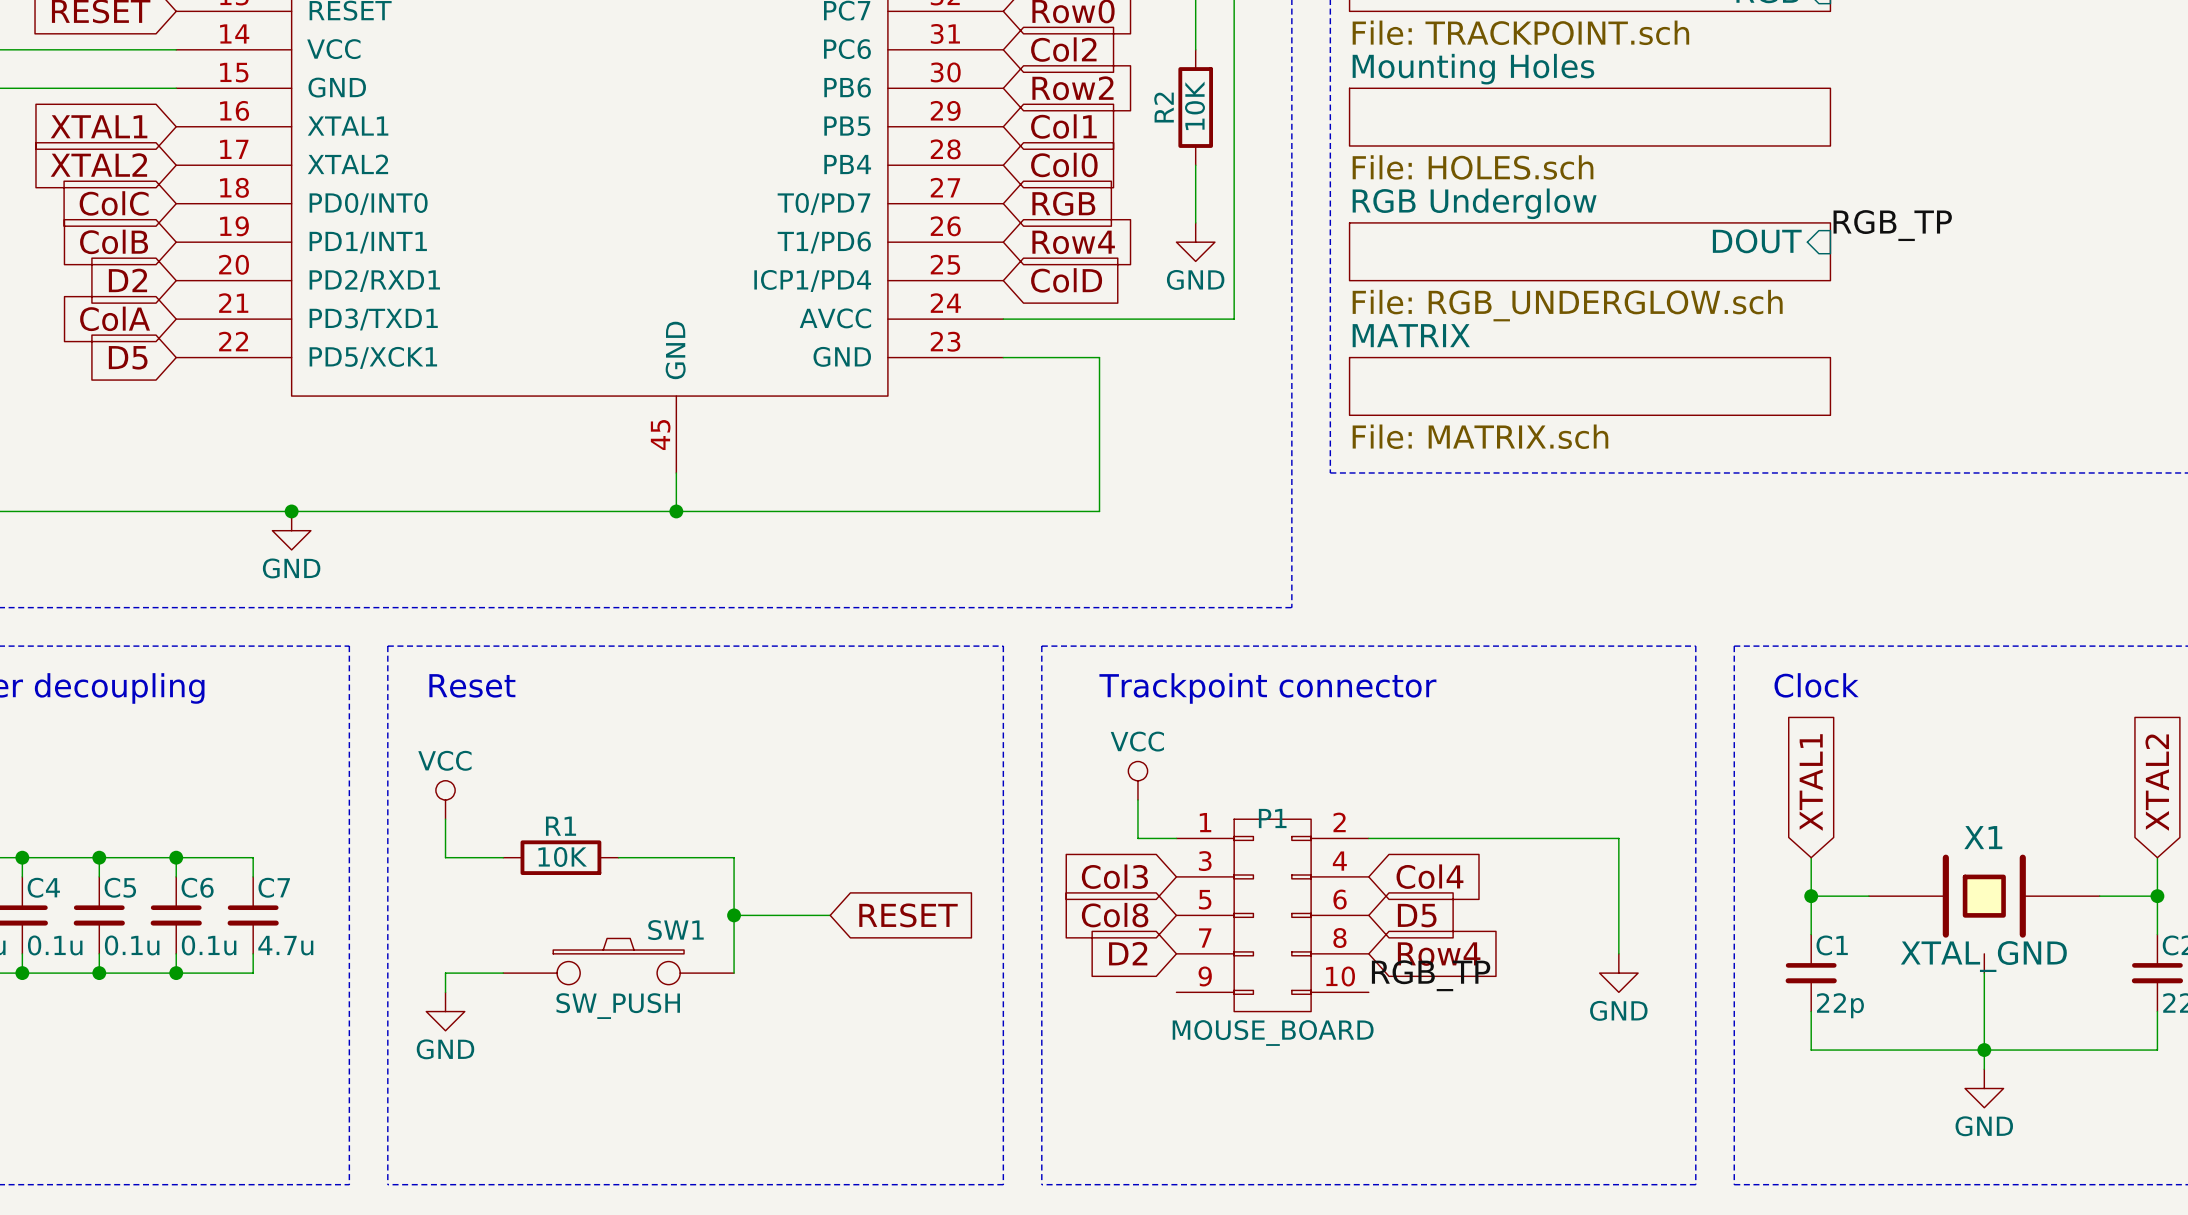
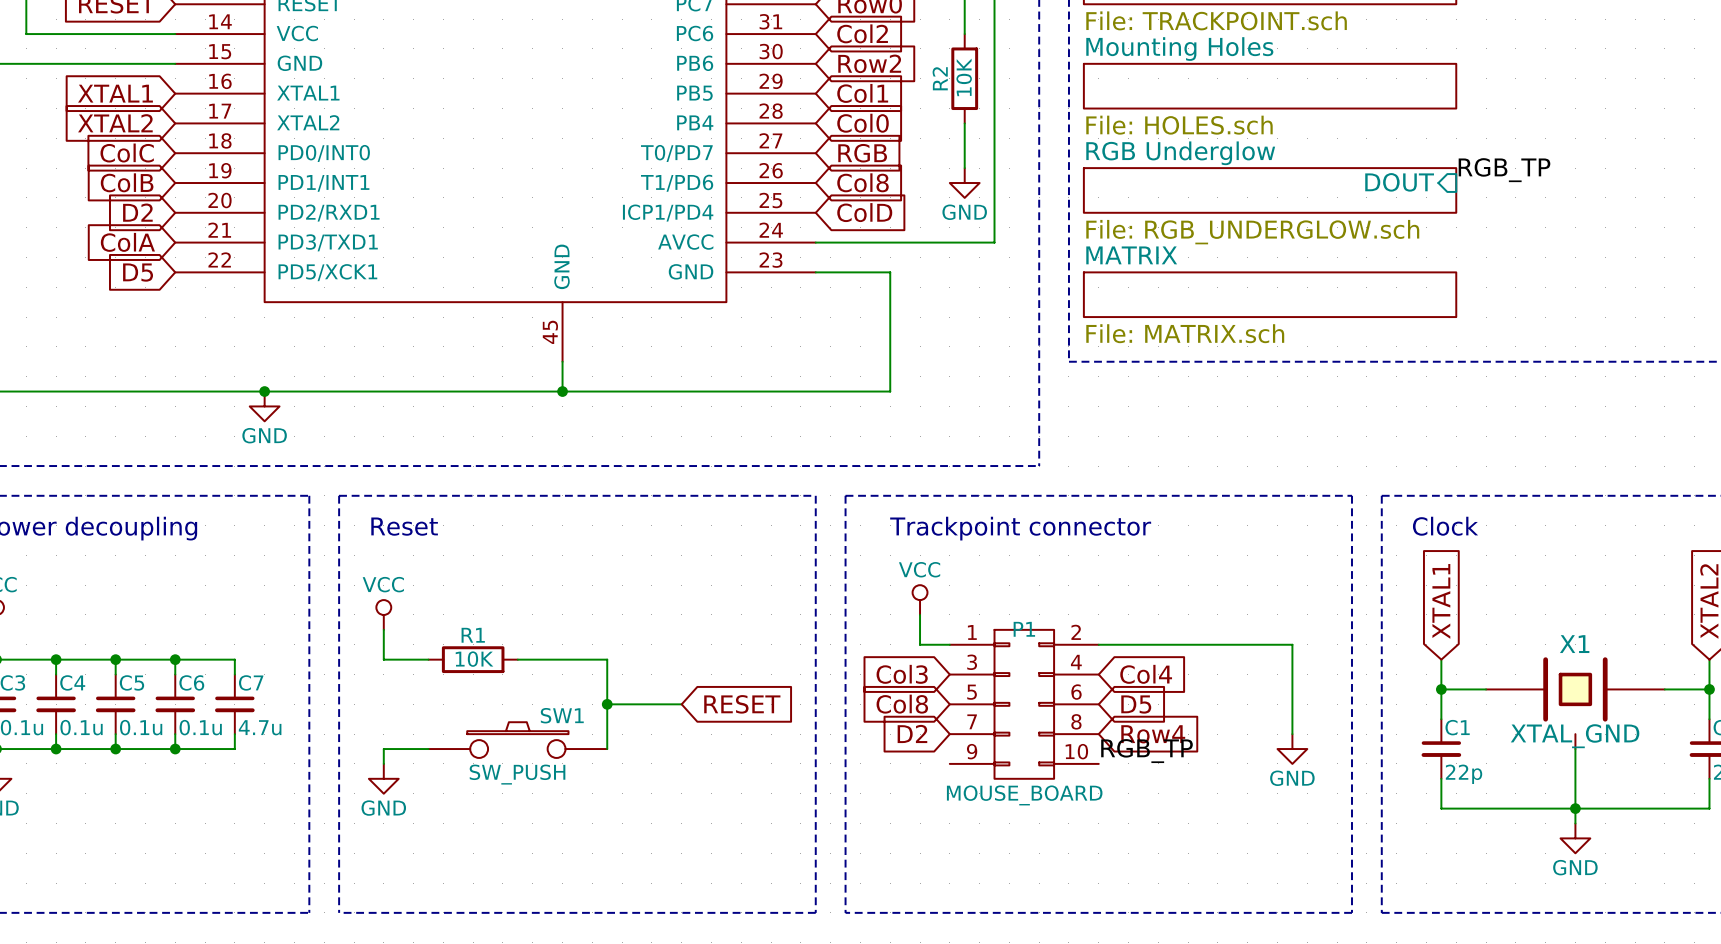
global label: Row4 (1073, 242) -> Col8 (862, 182)

